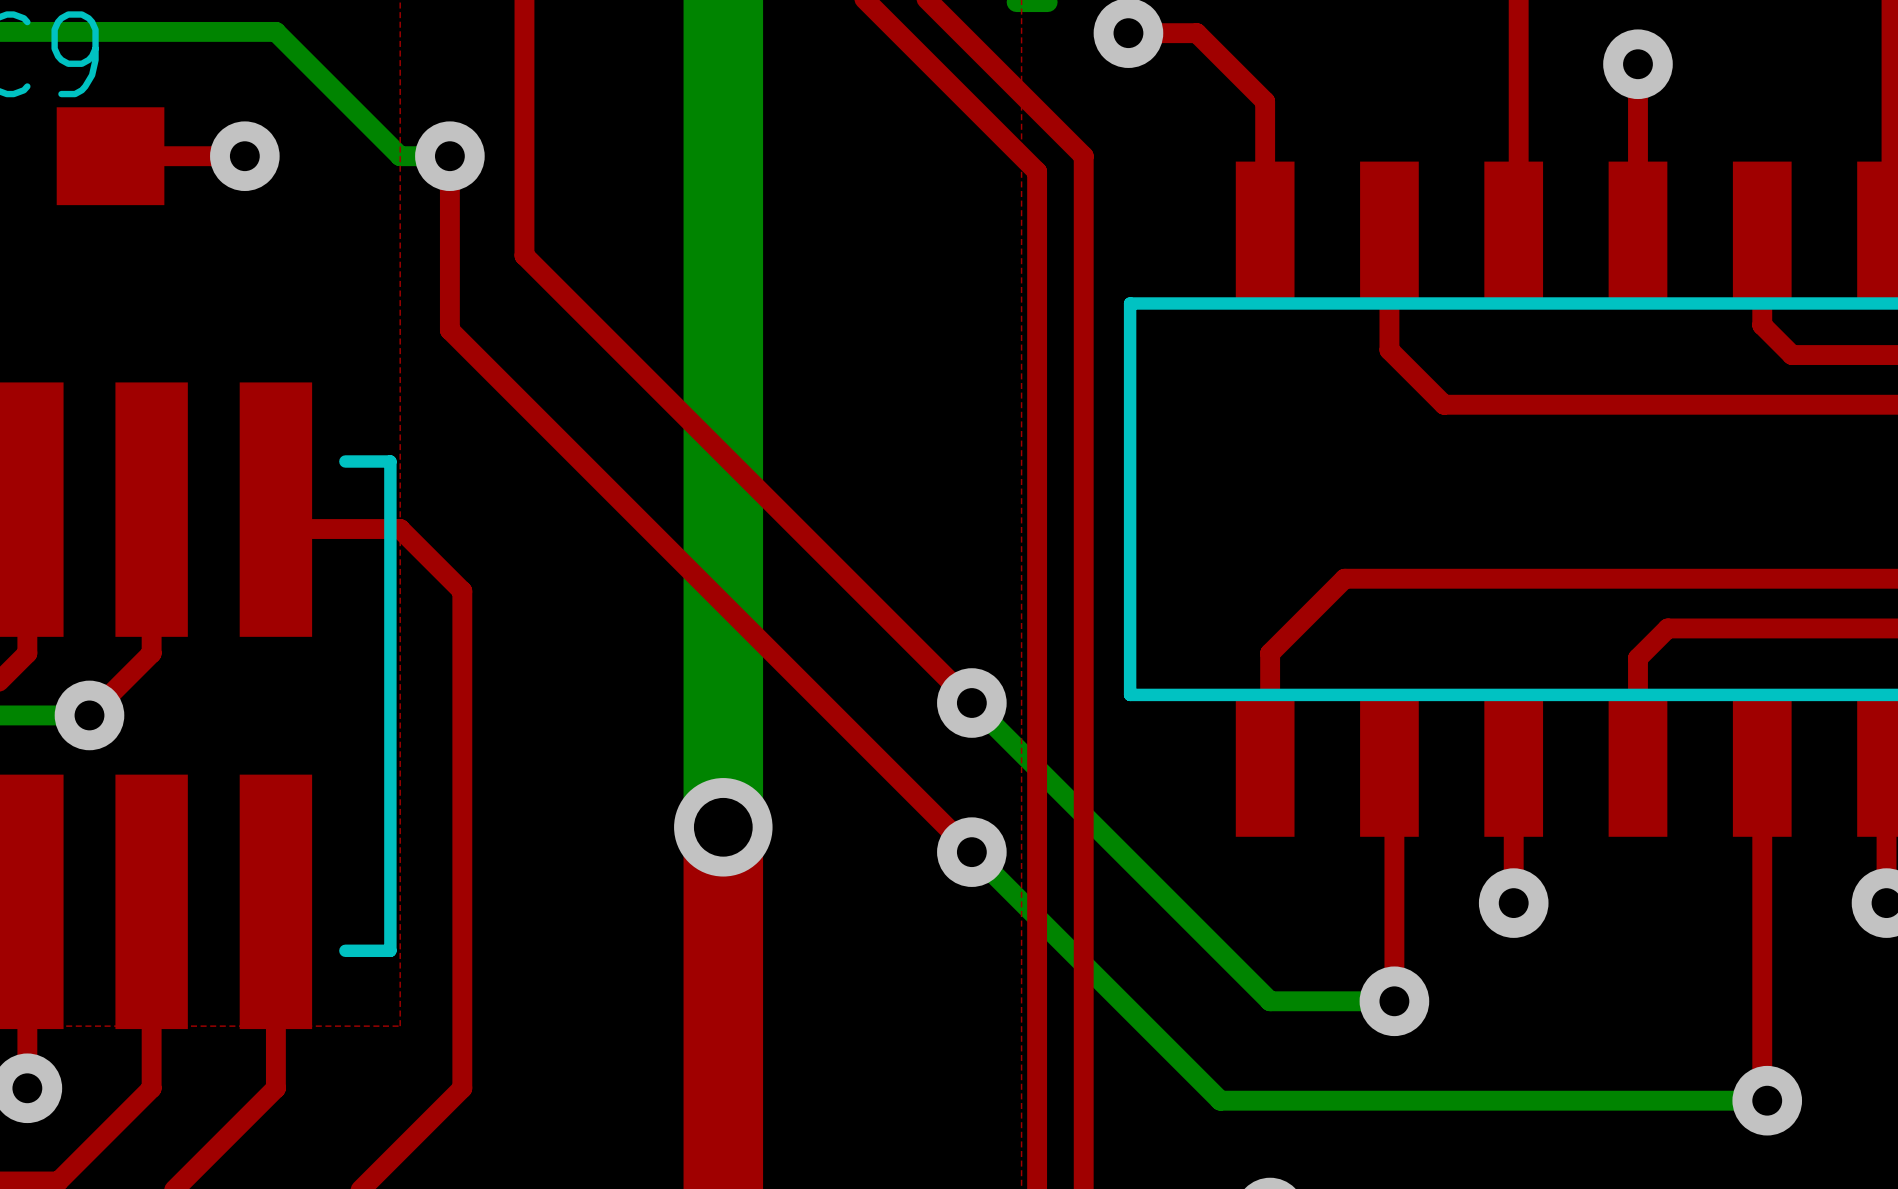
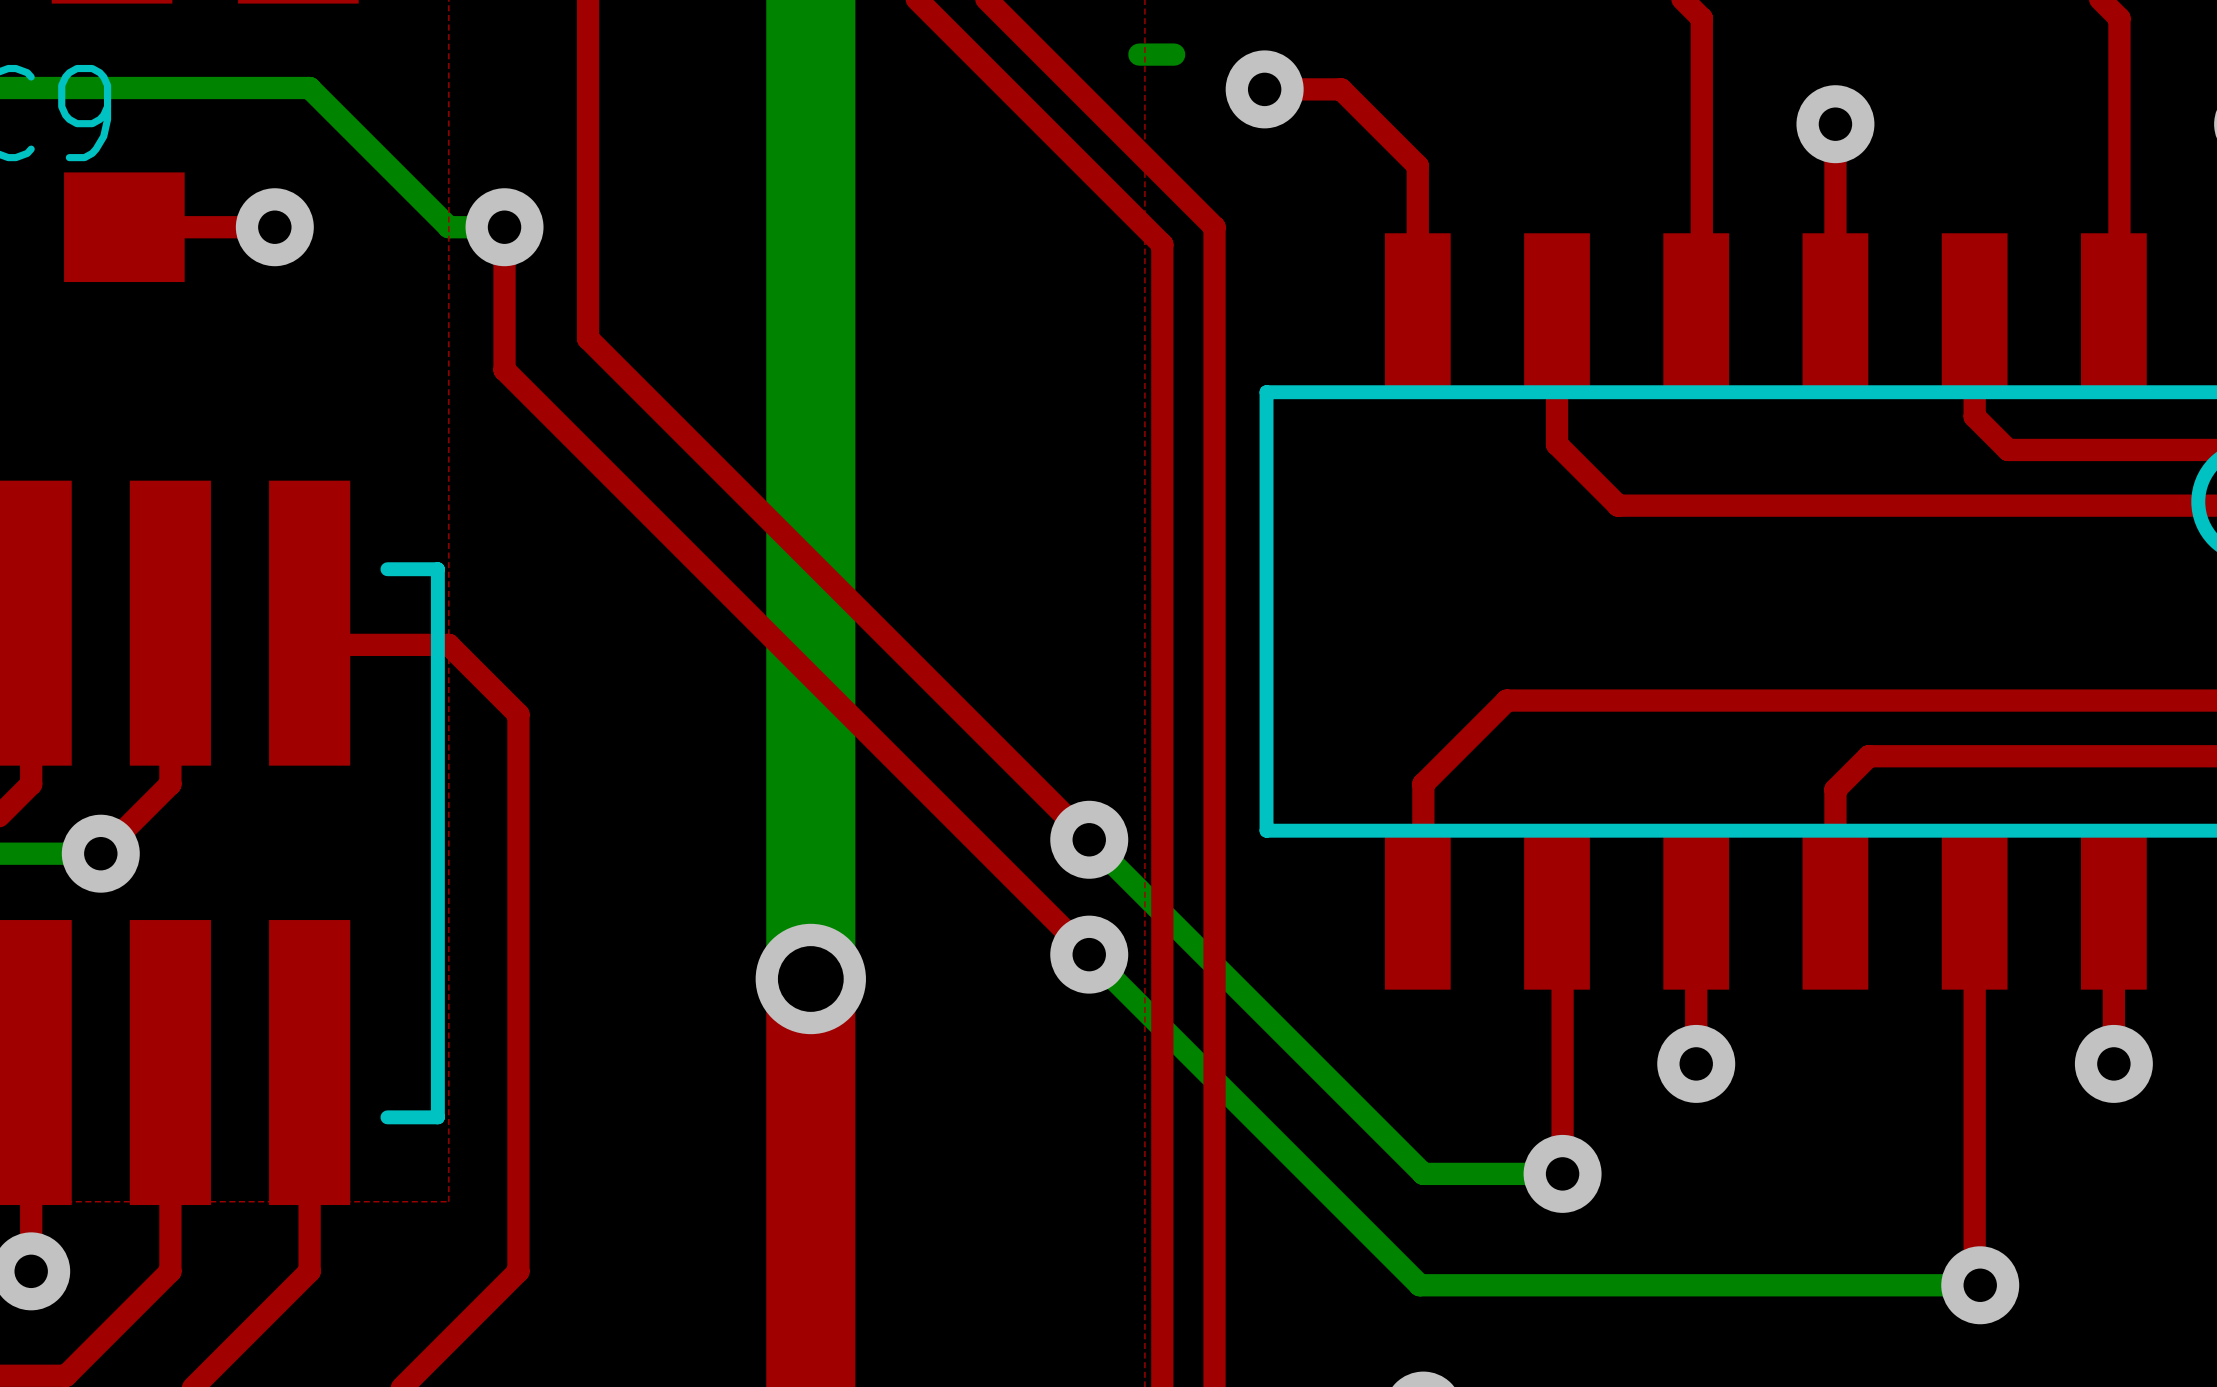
top track: (449, 283) (449, 330) (971, 852) -> (504, 369) (1089, 954)
bottom track: (971, 852) (1220, 1100) (1267, 1100) -> (1089, 954) (1419, 1285)
via position: (971, 852) -> (1089, 954)

